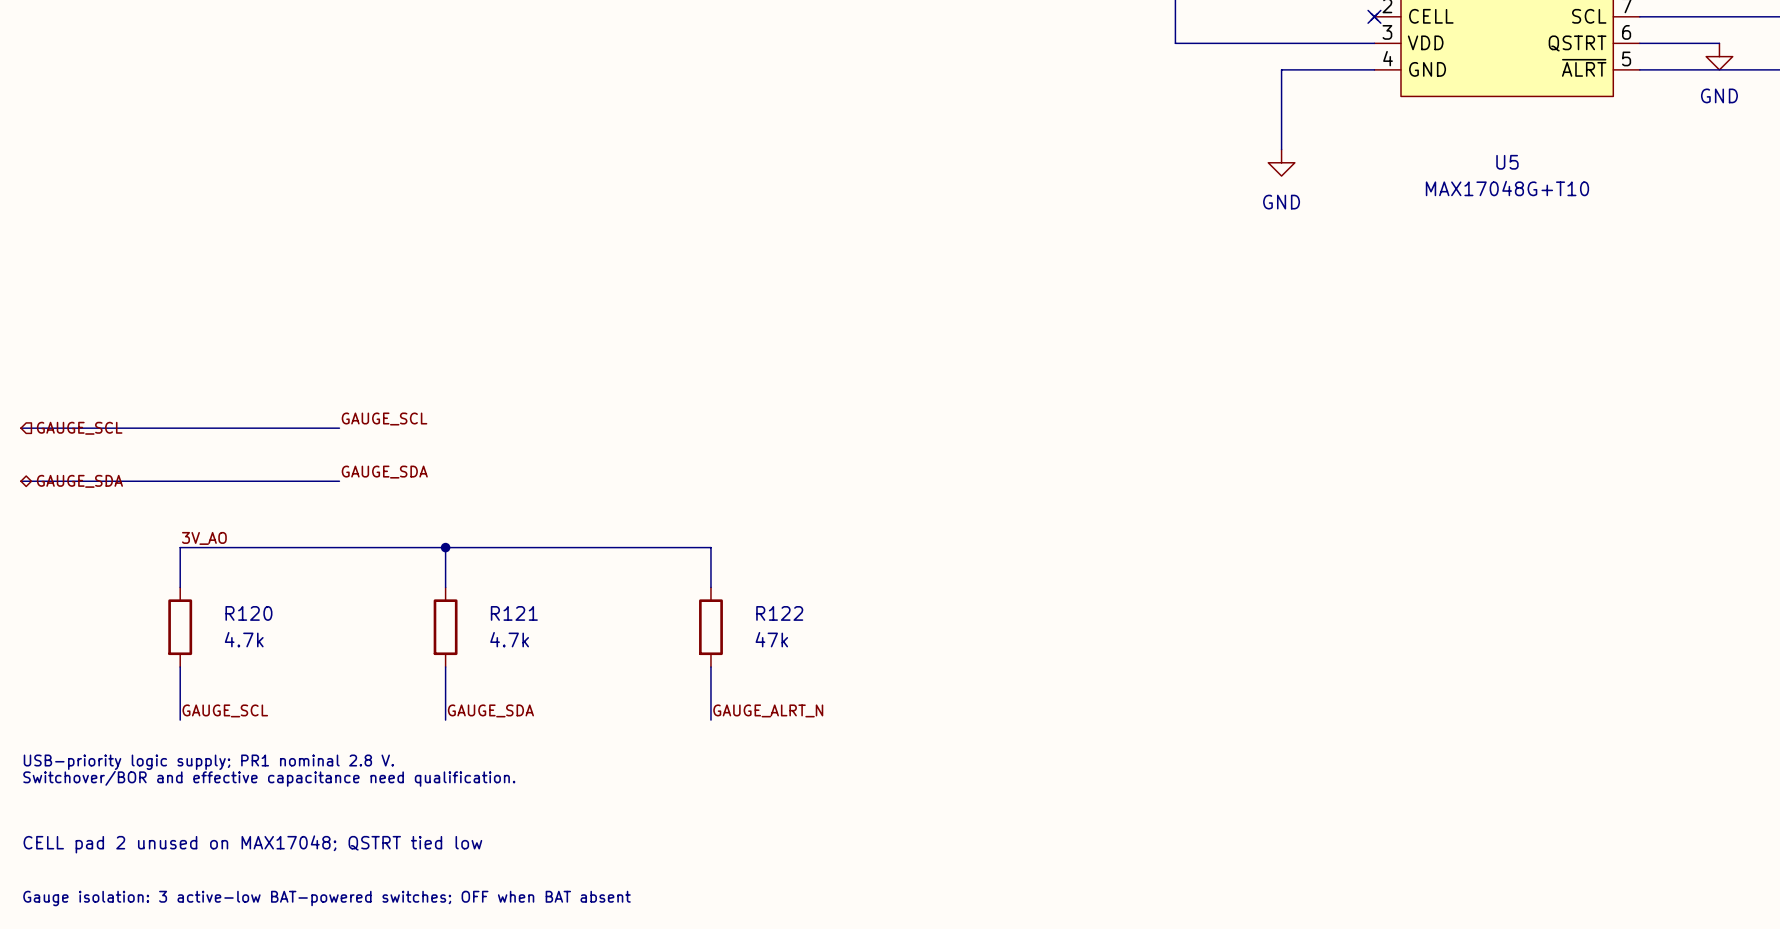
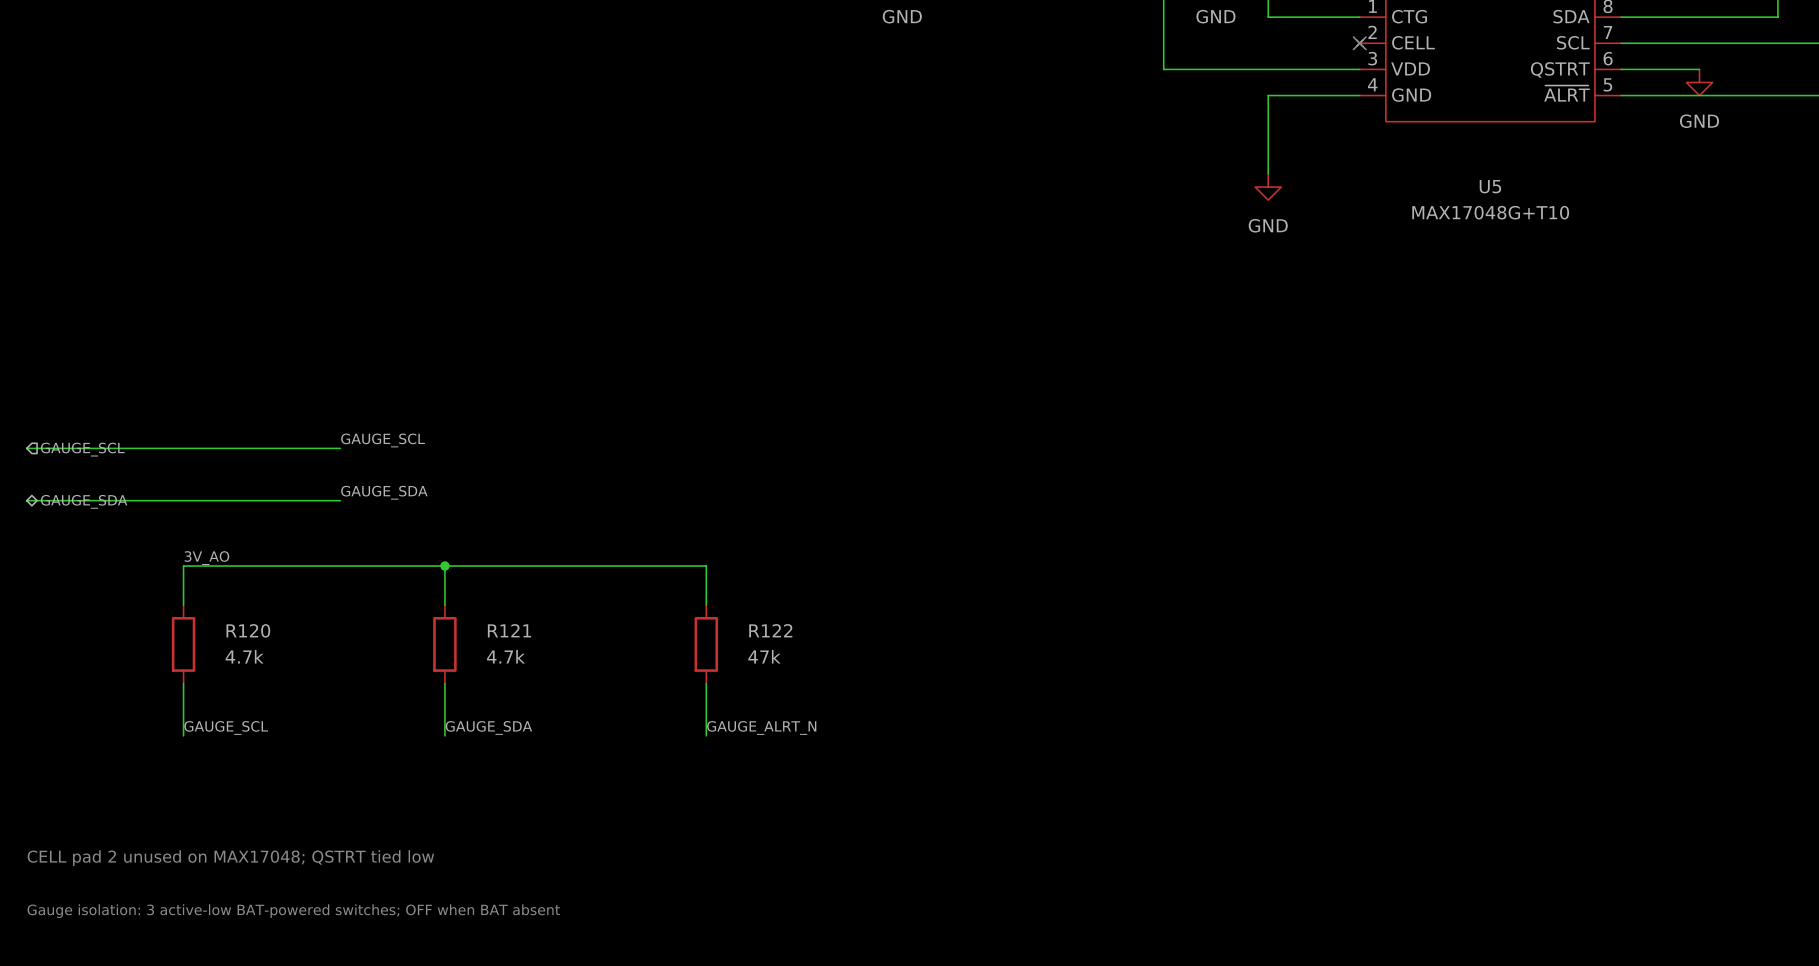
text: USB-priority logic supply; PR1 nominal 2.8 V. (208, 762) -> none
text: Switchover/BOR and effective capacitance need qualification. (269, 778) -> none

